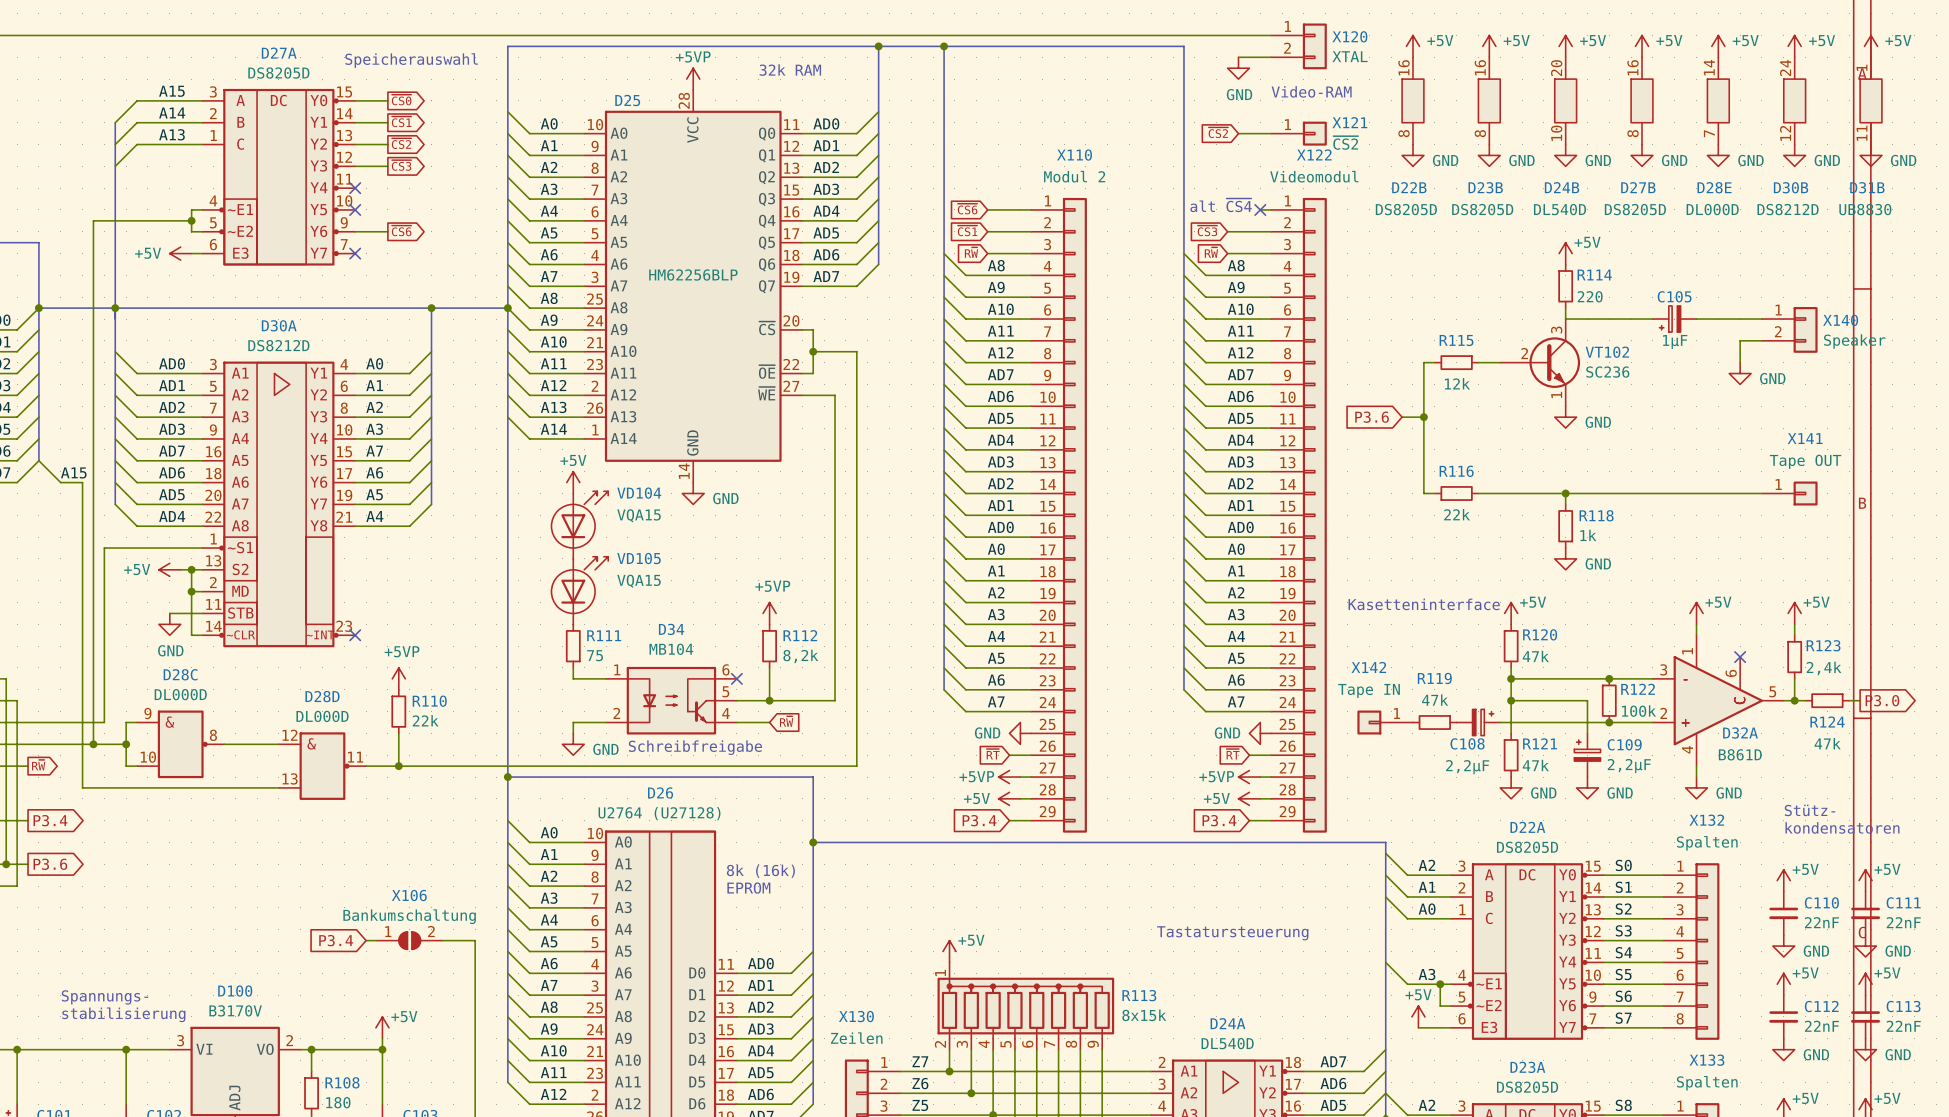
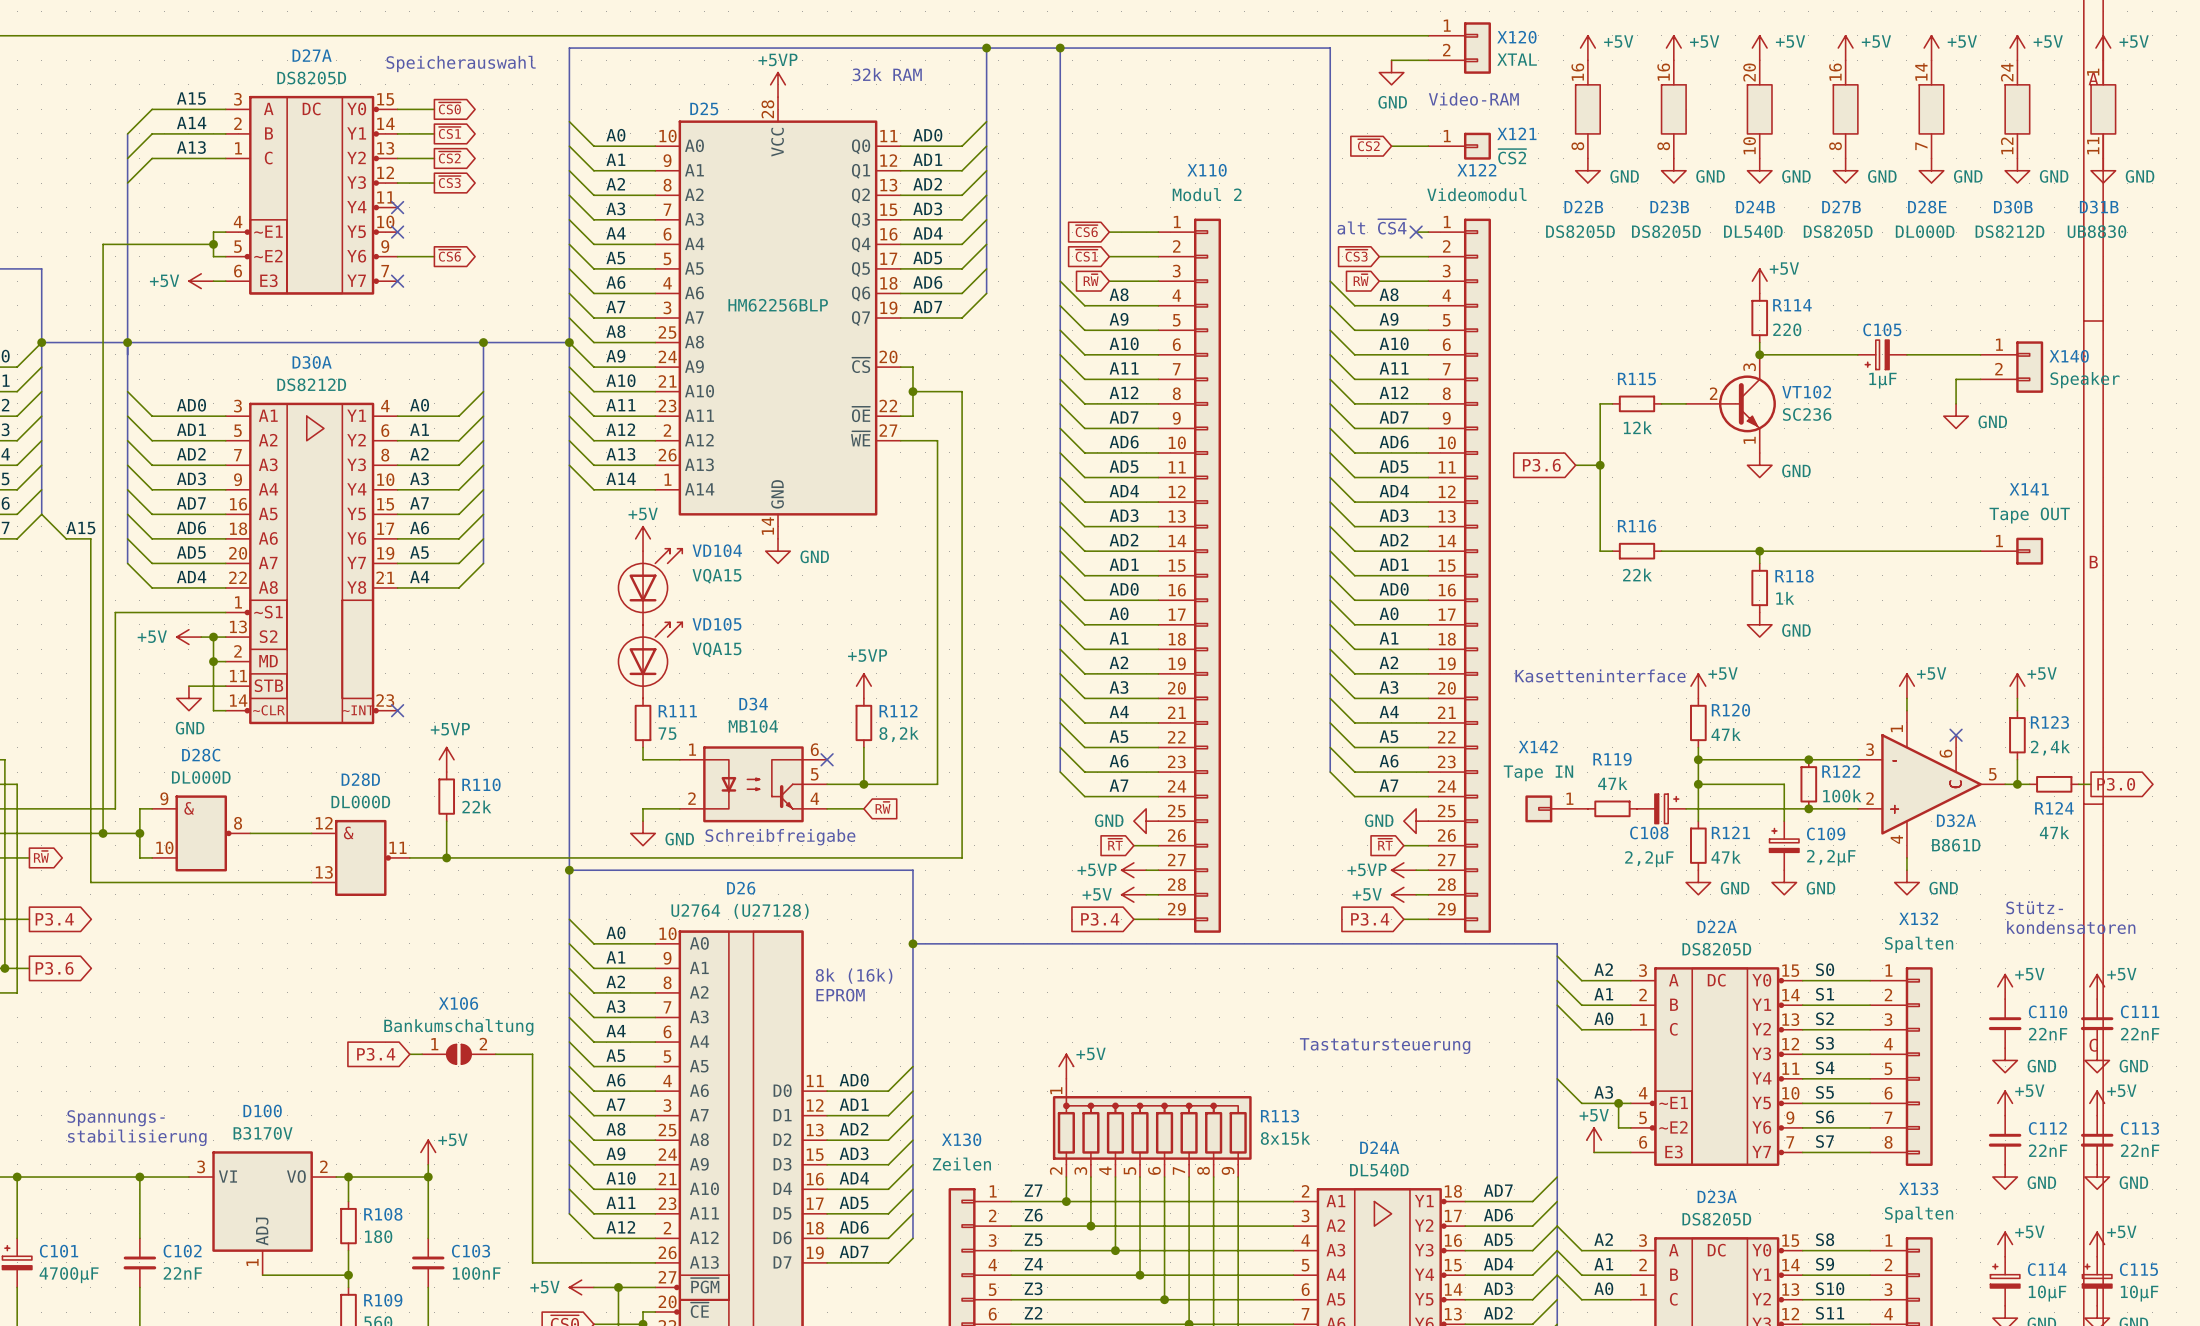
junction: none -> (1759, 354)

